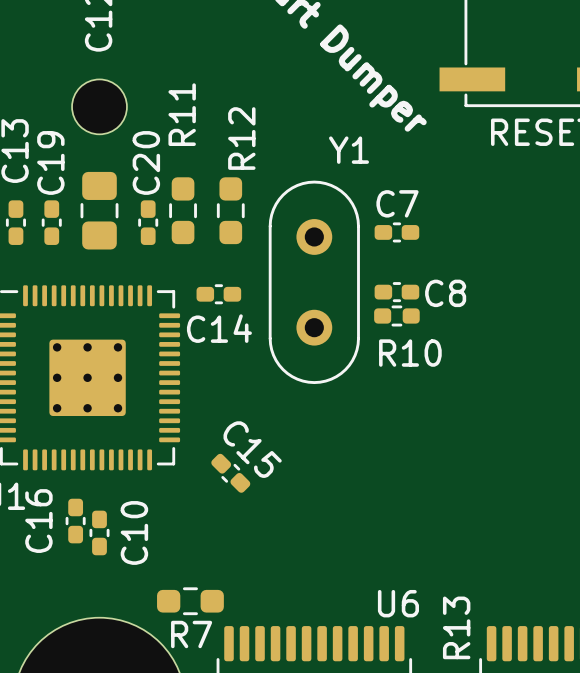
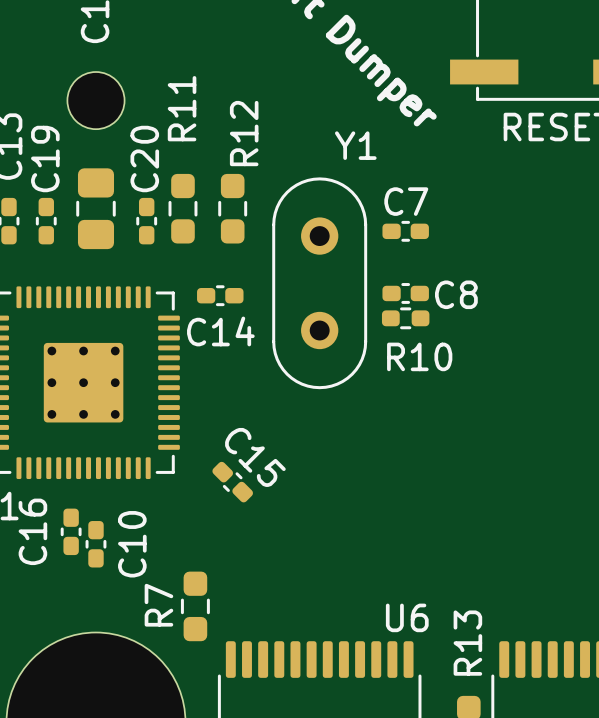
R7 rotation: 0° (190, 601) -> 90° clockwise (195, 606)

